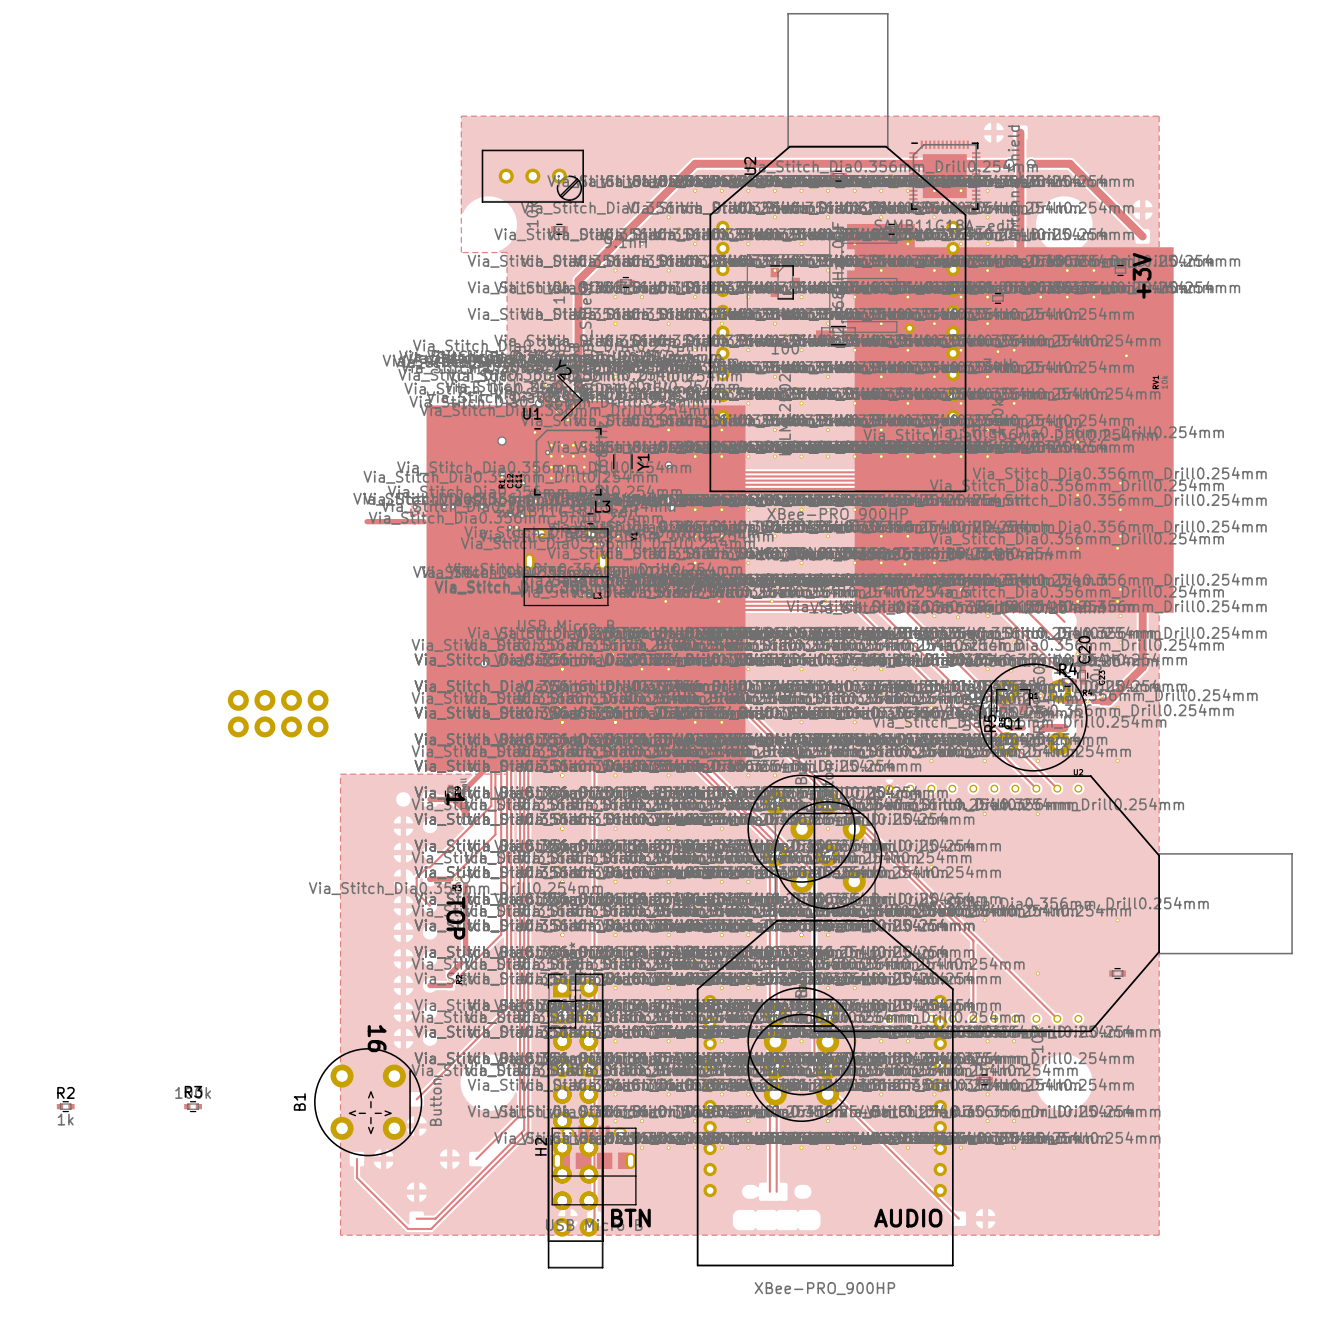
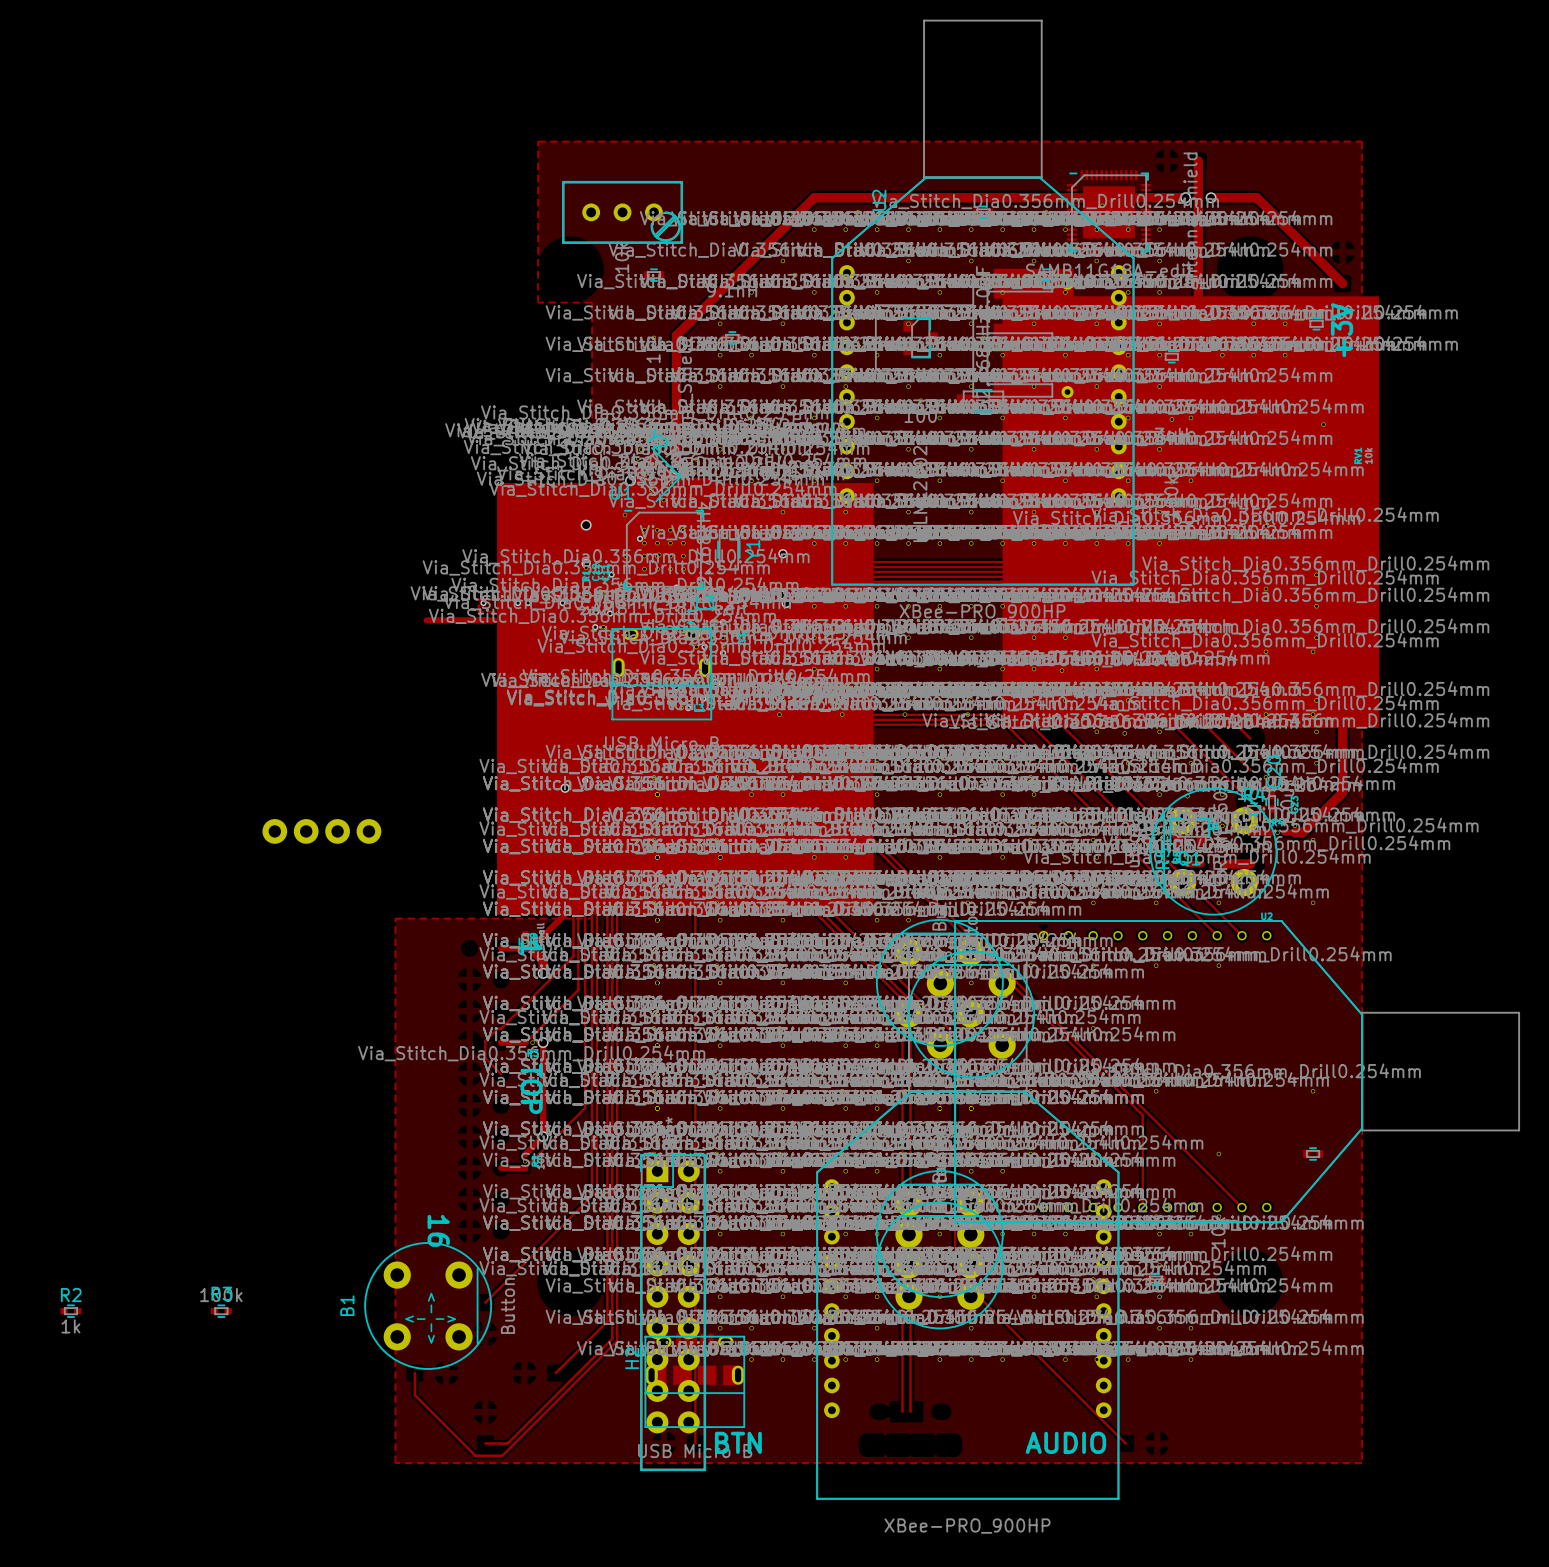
part: (415, 992) -> none

